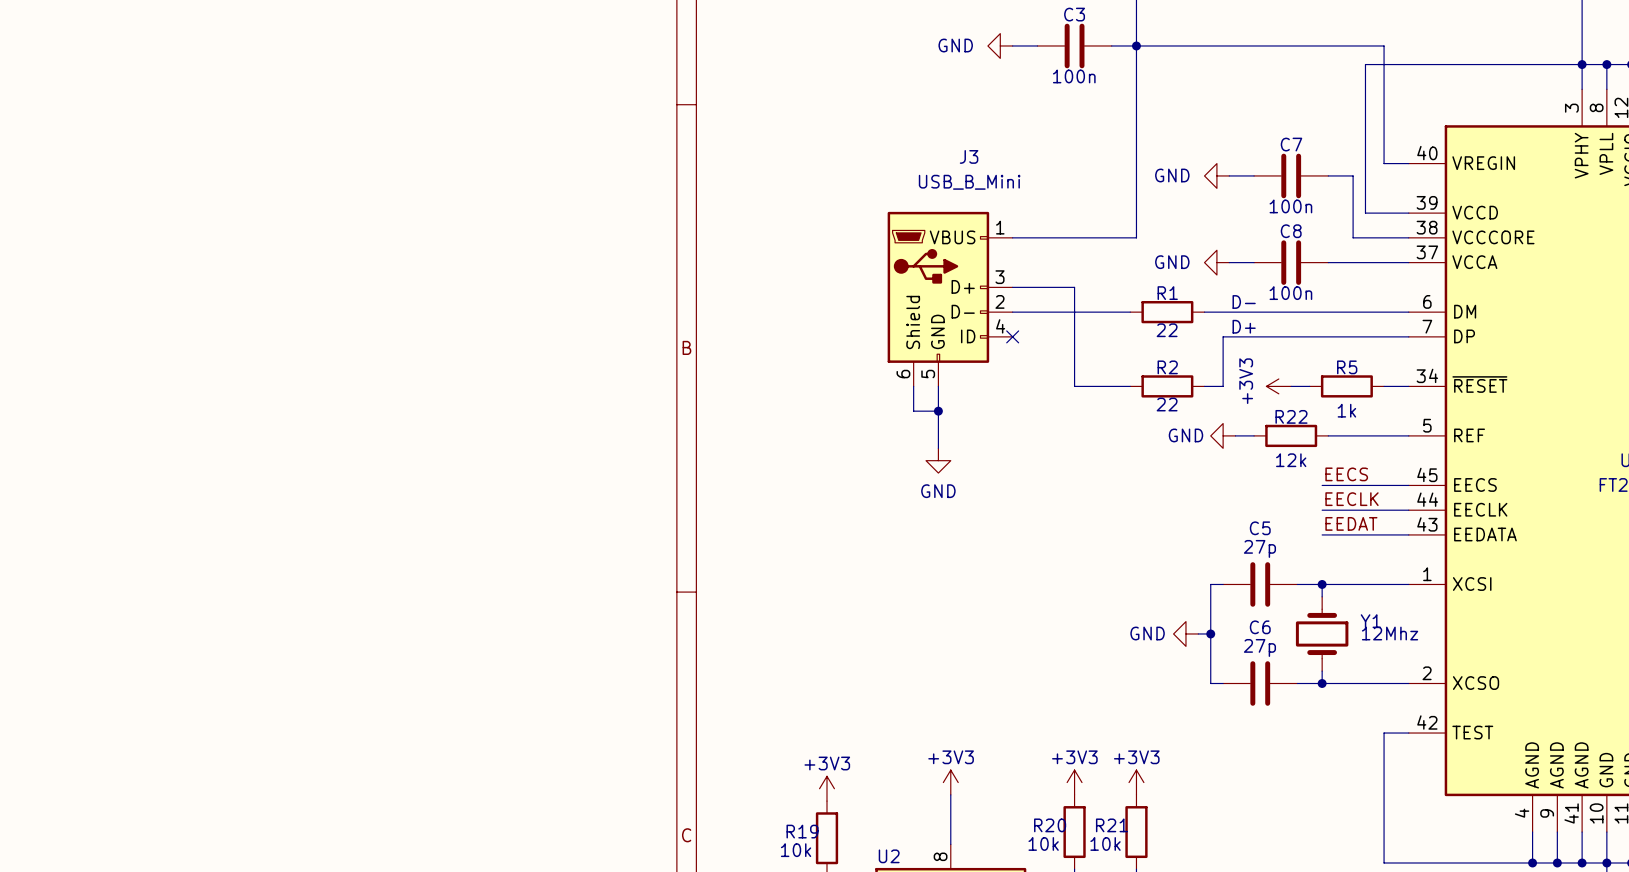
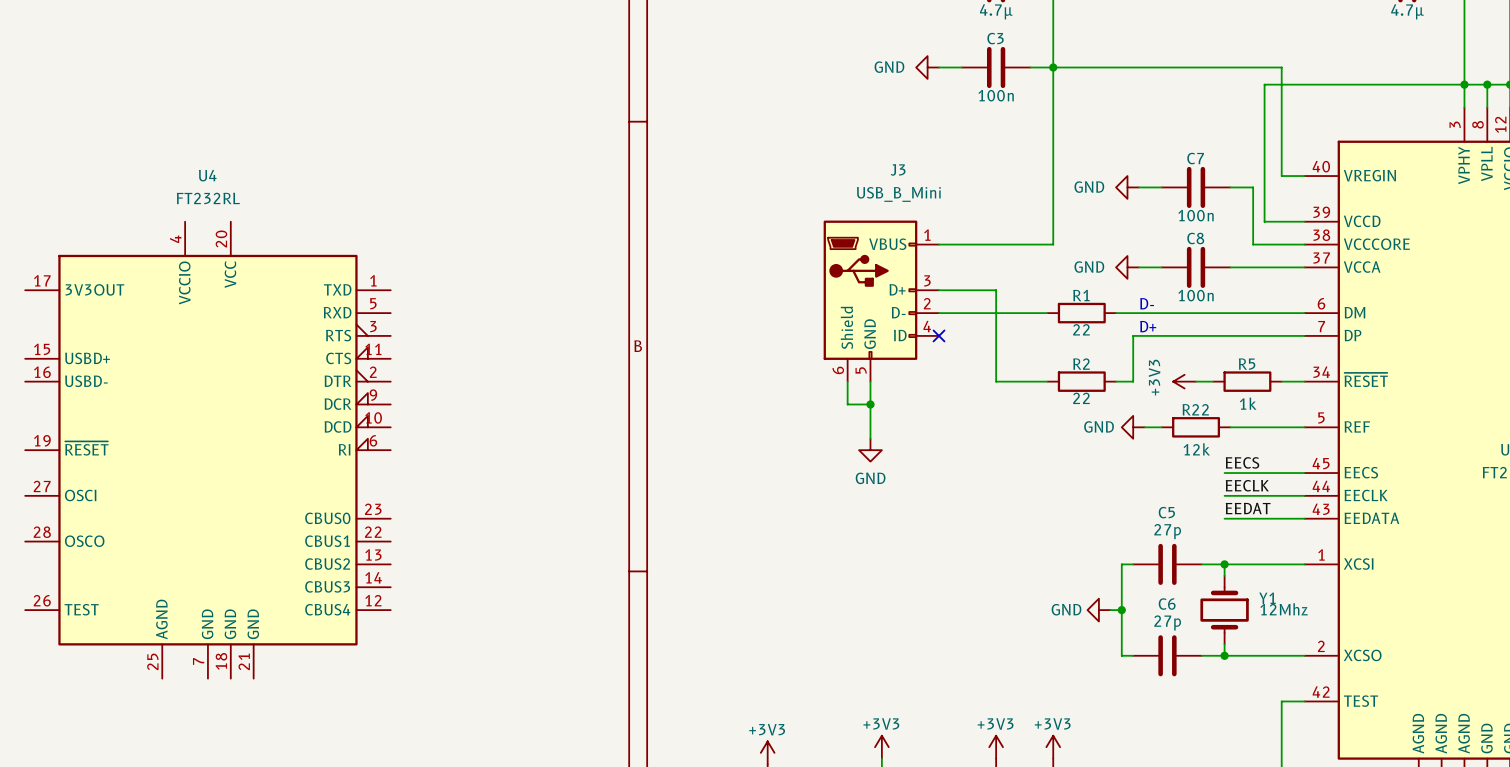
U4: none -> FT232RL (207, 450)

